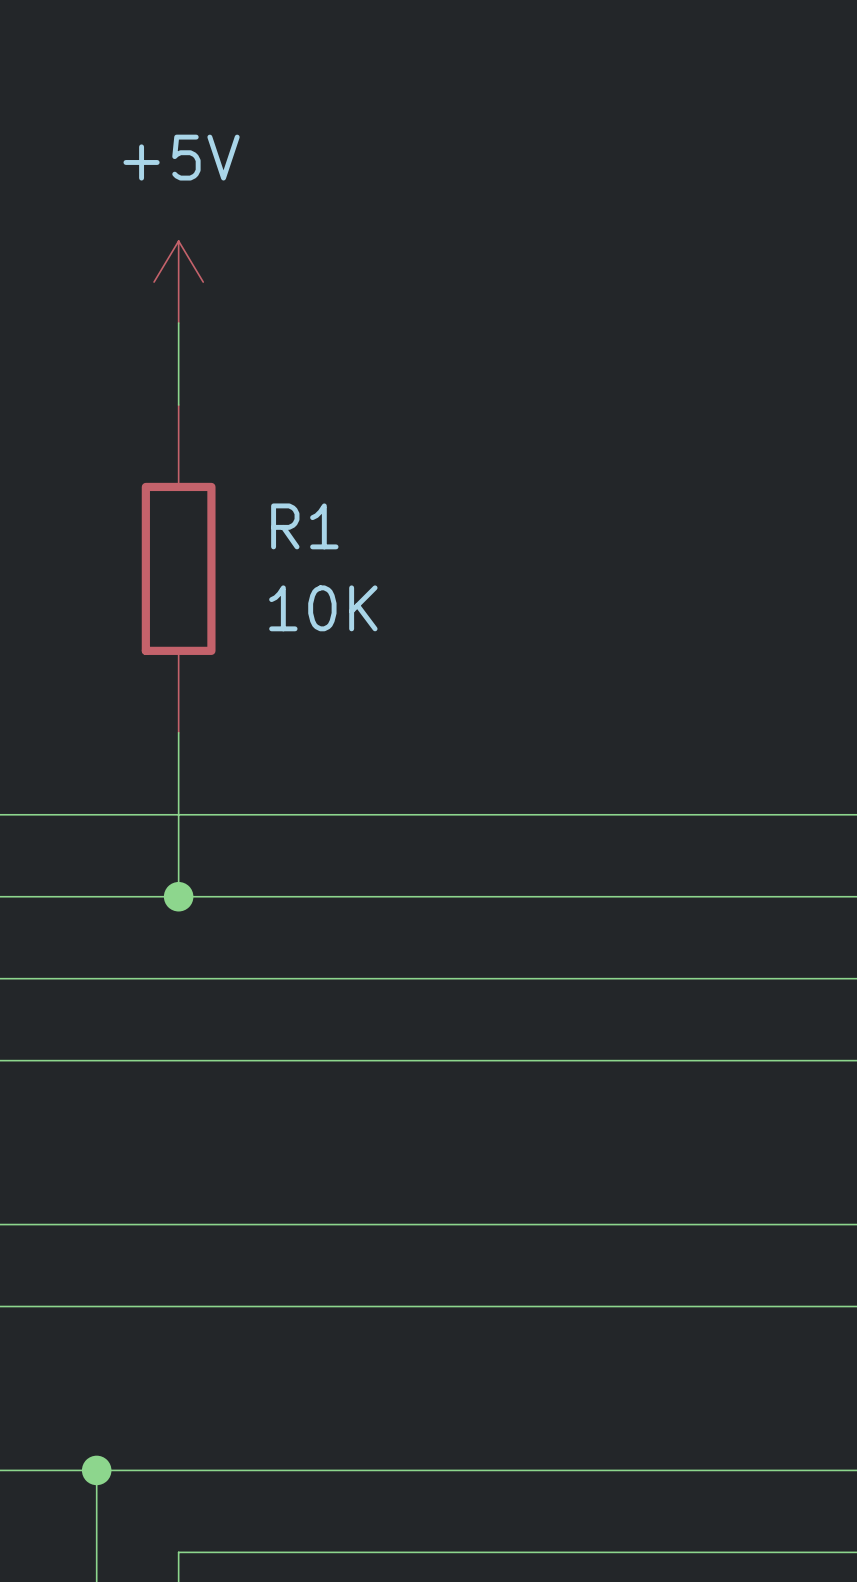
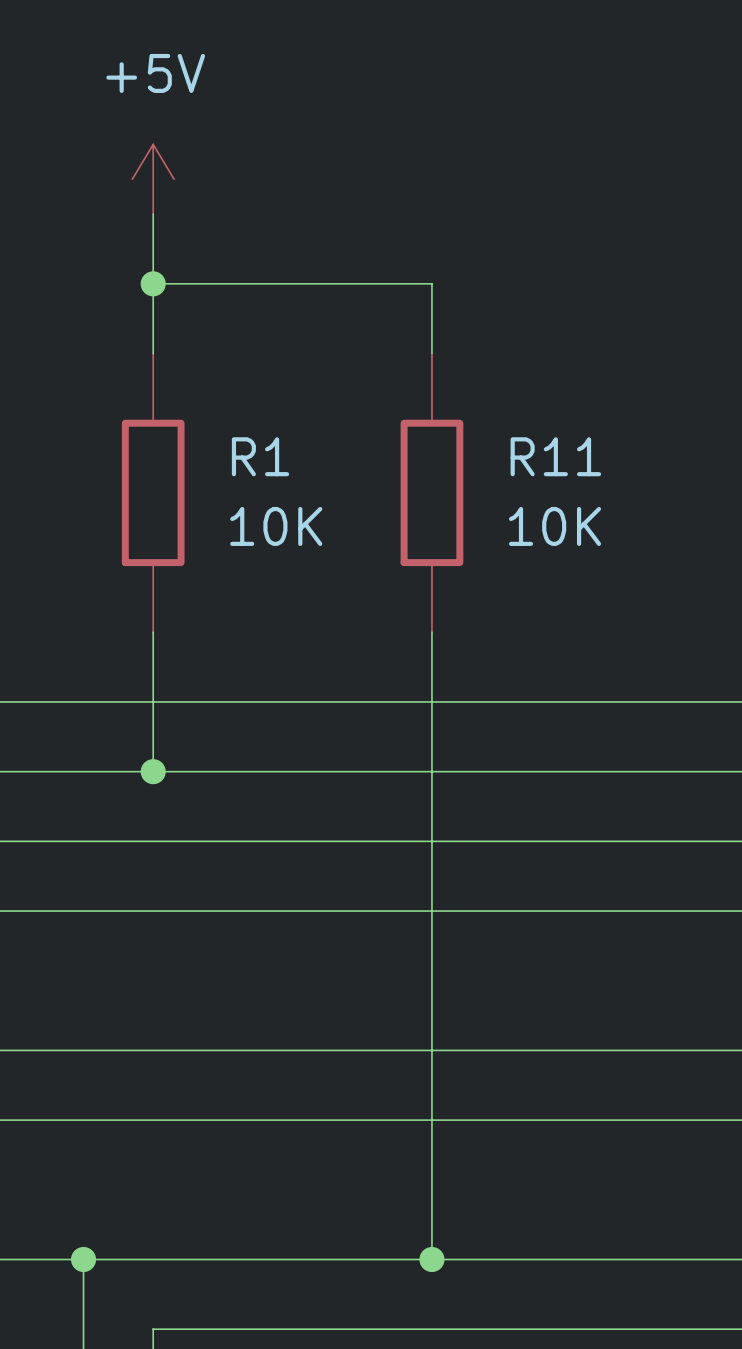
wire: none -> (153, 214) (153, 283) (431, 283) (431, 353)
power symbol position: +5V (178, 282) -> +5V (153, 179)
junction: none -> (153, 283)
R11: none -> 10K (431, 492)
wire: none -> (431, 632) (431, 1259)
junction: none -> (431, 1259)

